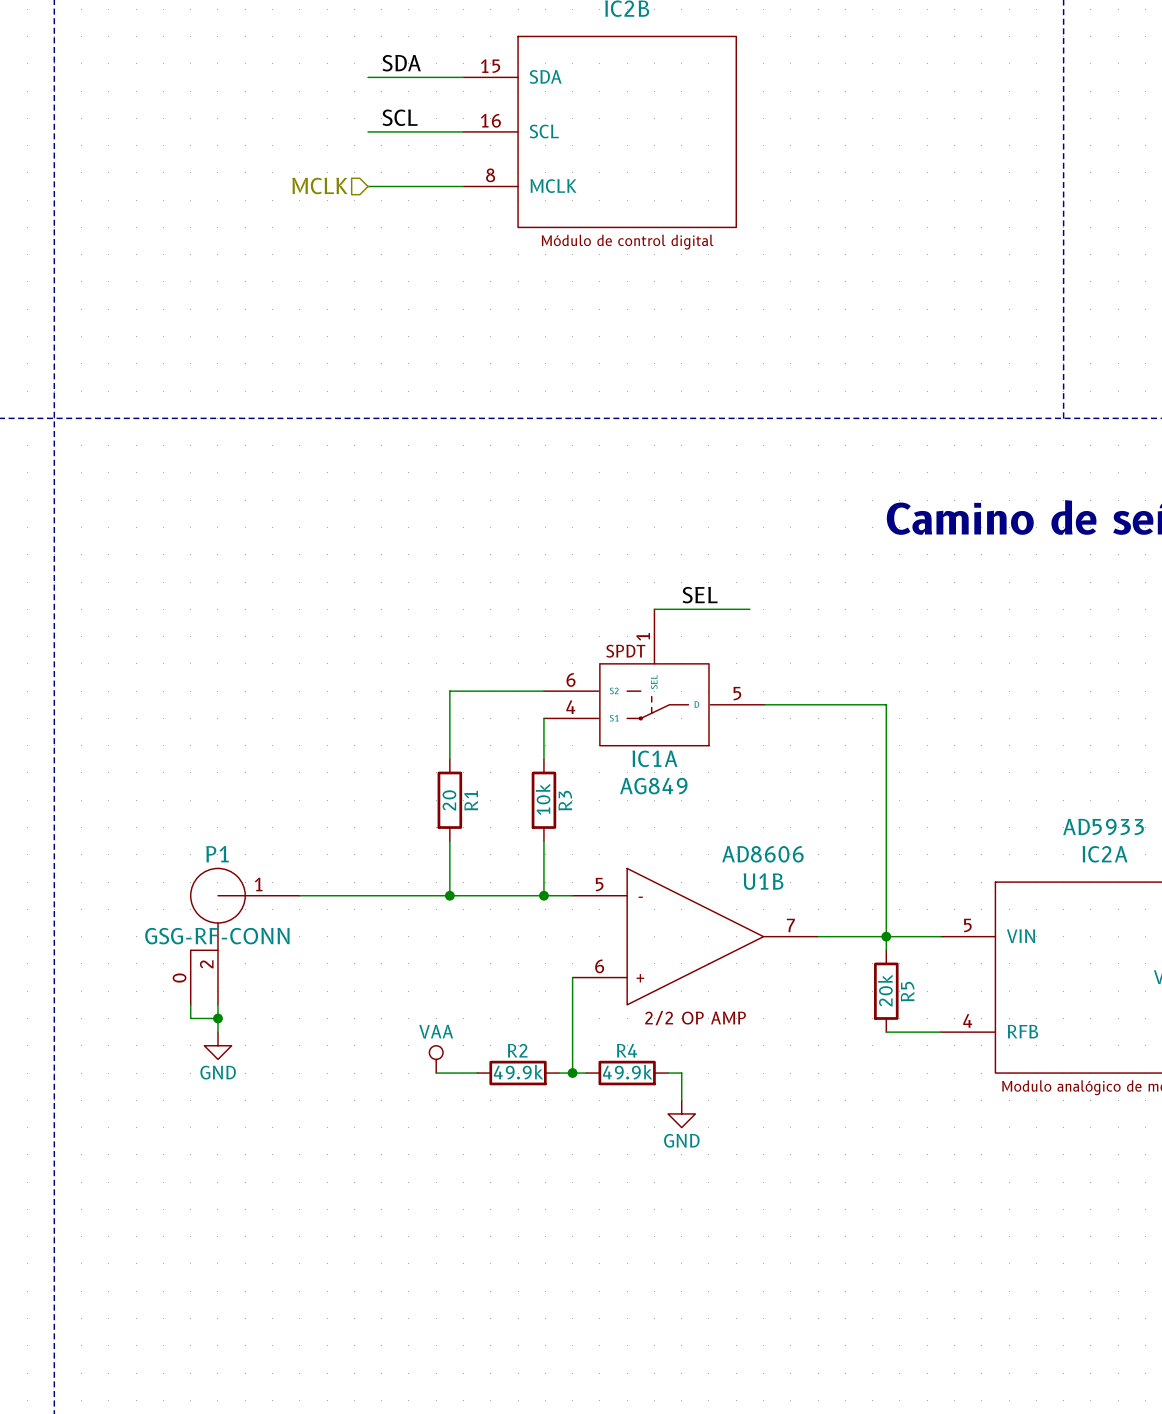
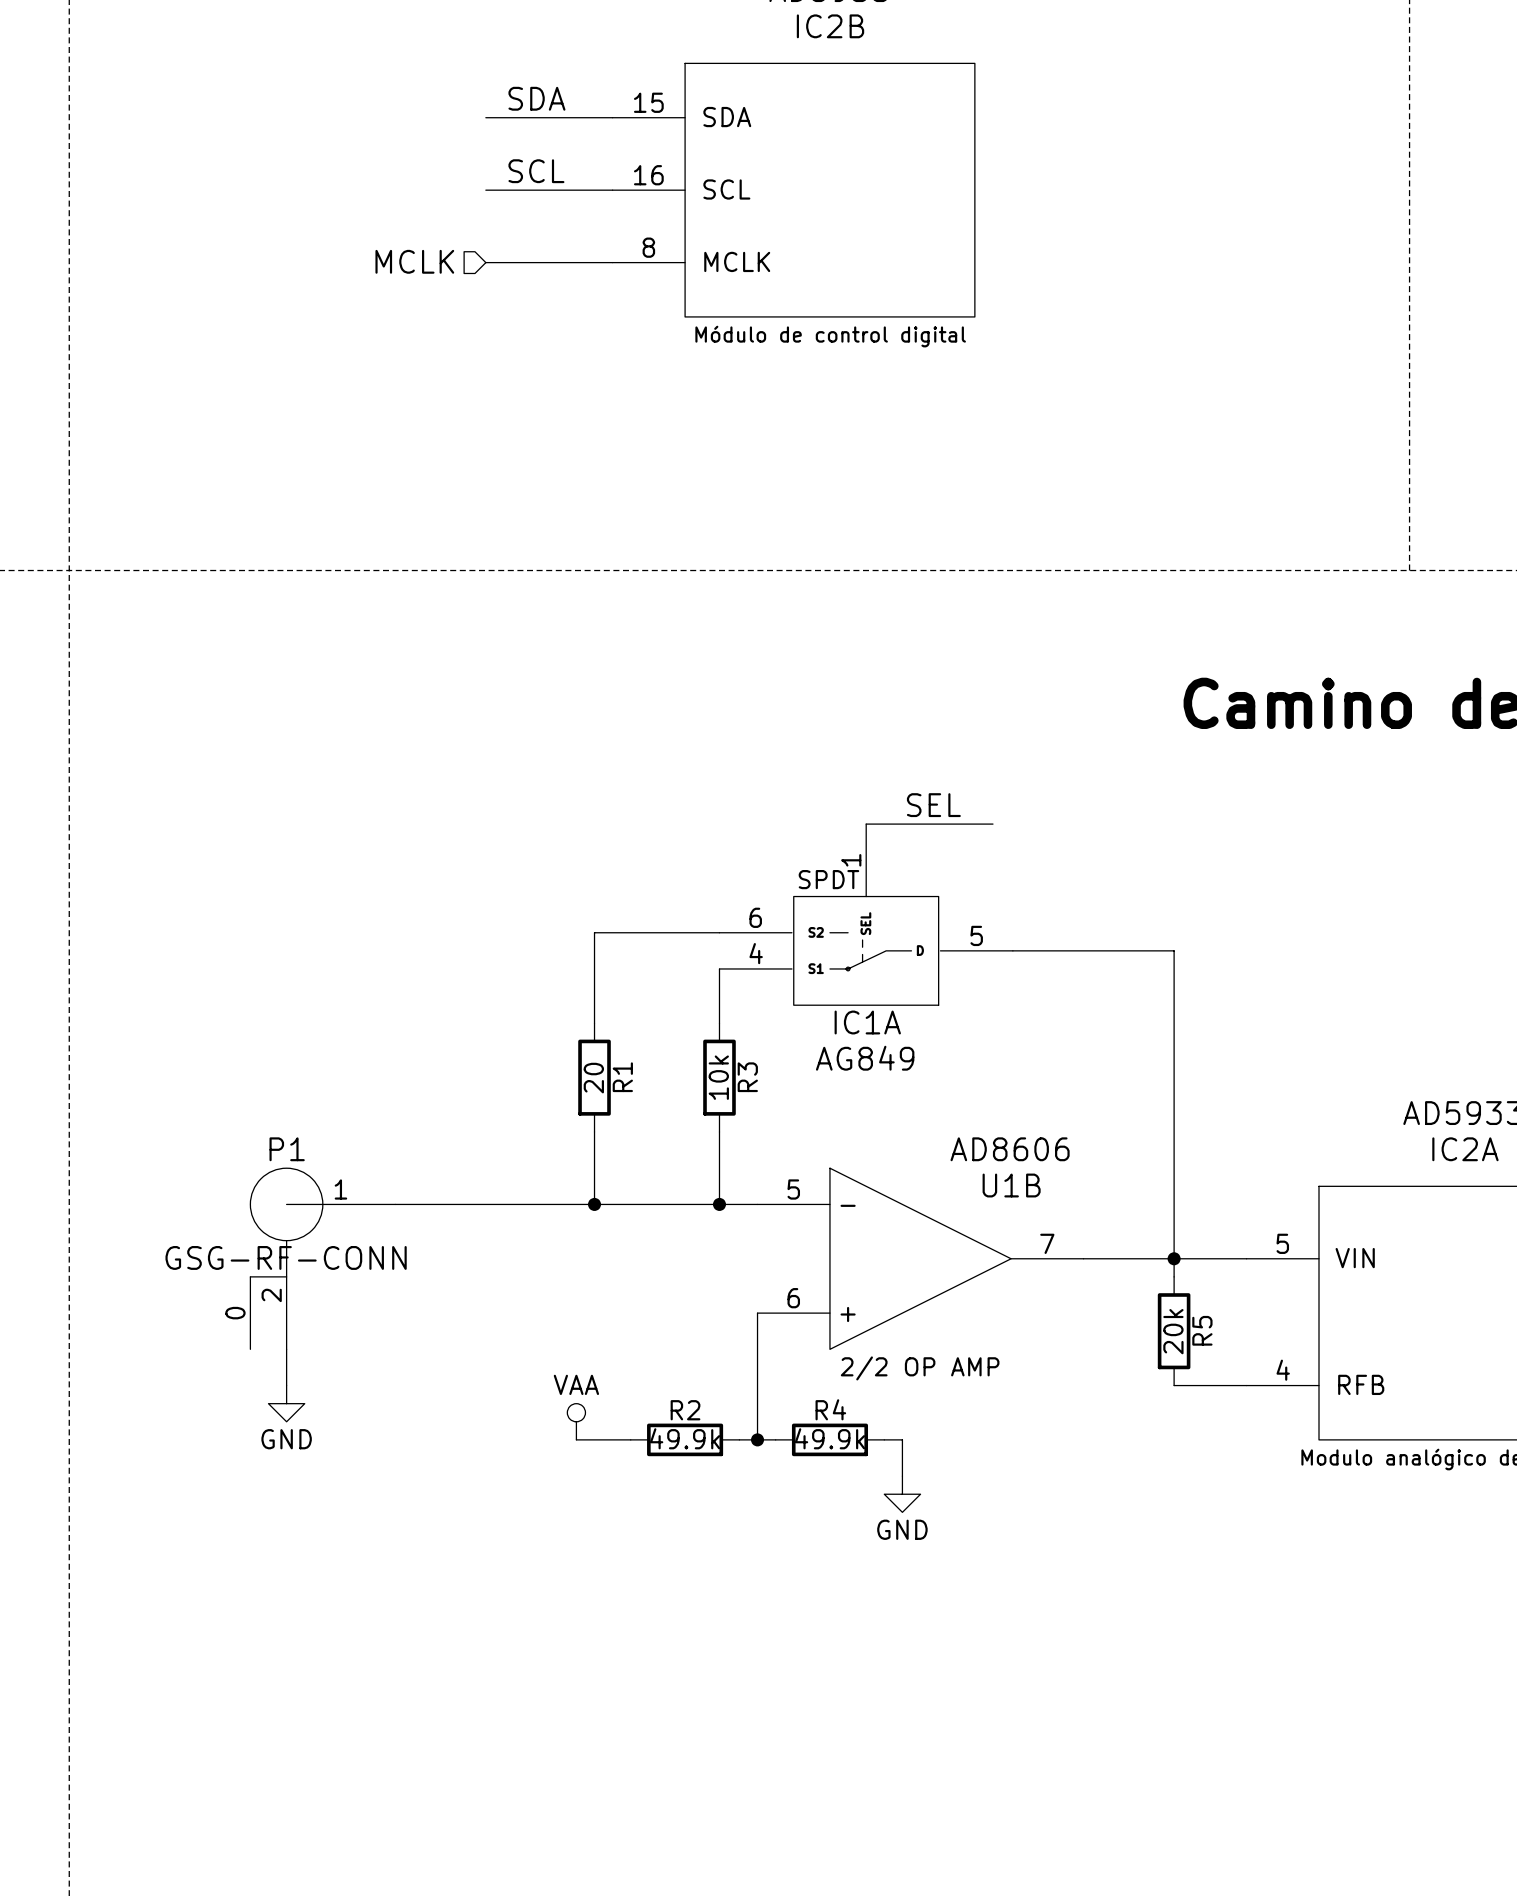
wire: (190, 1004) (190, 1018) (217, 1018) -> none
junction: (217, 1018) -> none

